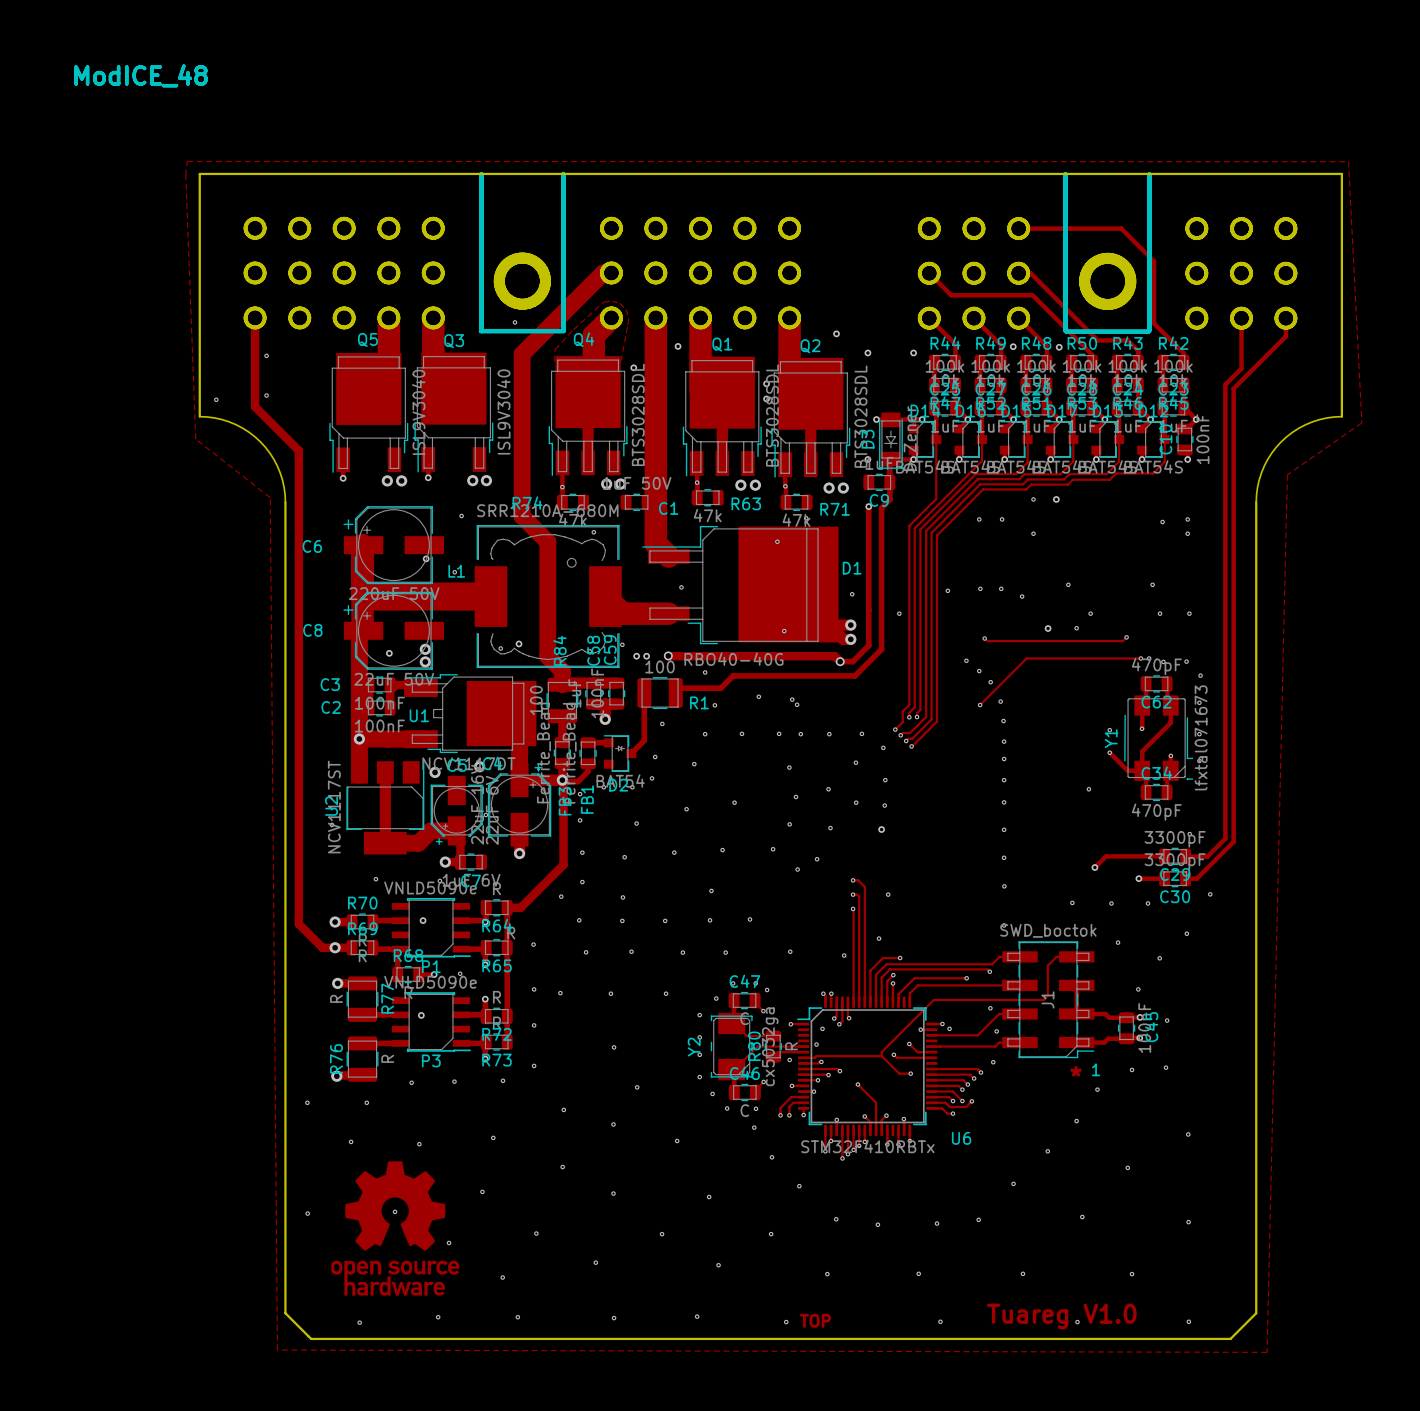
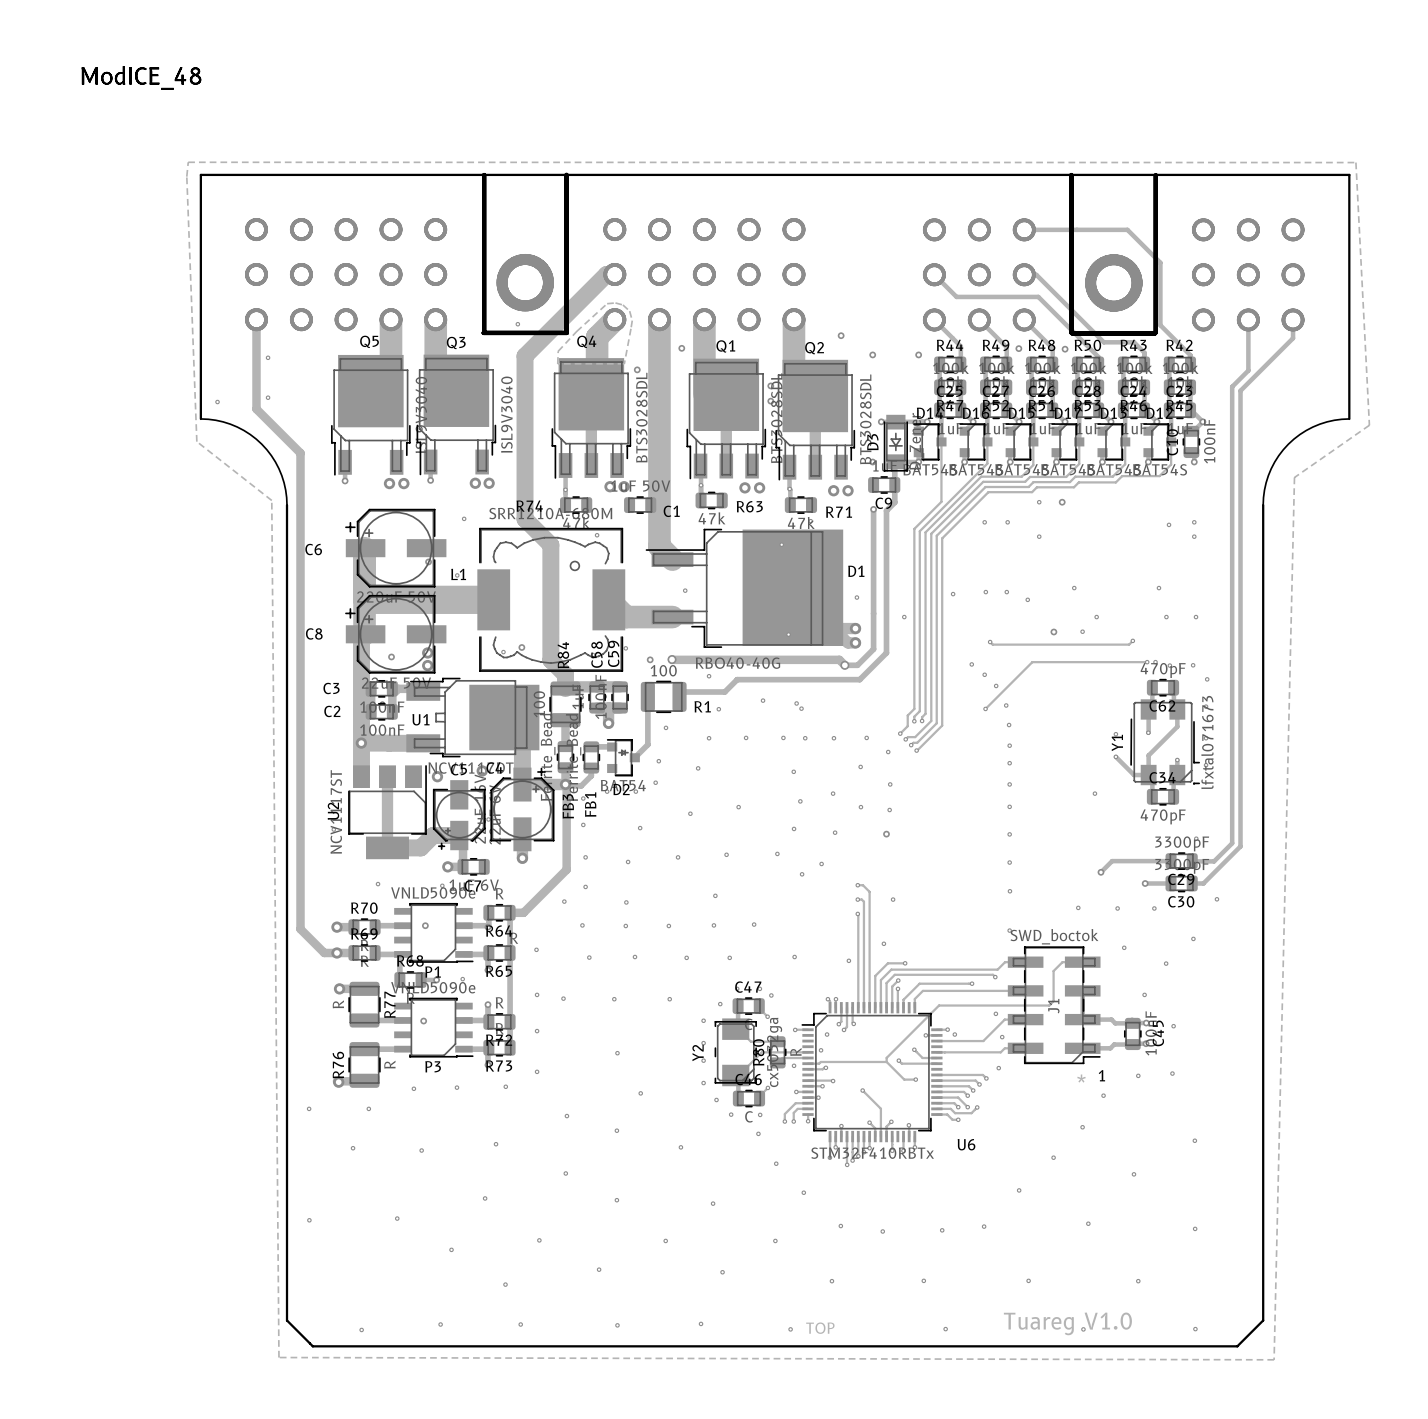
via: (636, 656) -> none
track: (803, 1069) (837, 1069) (839, 1071) -> none
via: (839, 1071) -> none
drawing: [331, 1161, 460, 1296] -> none

